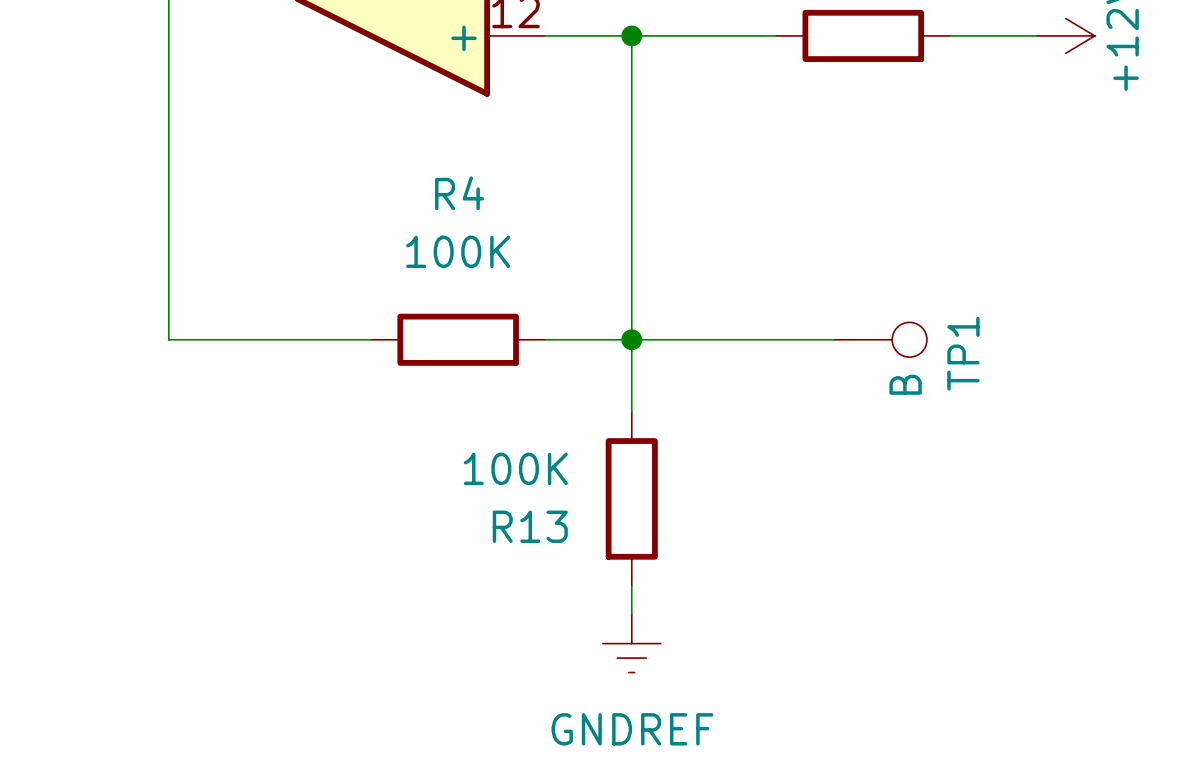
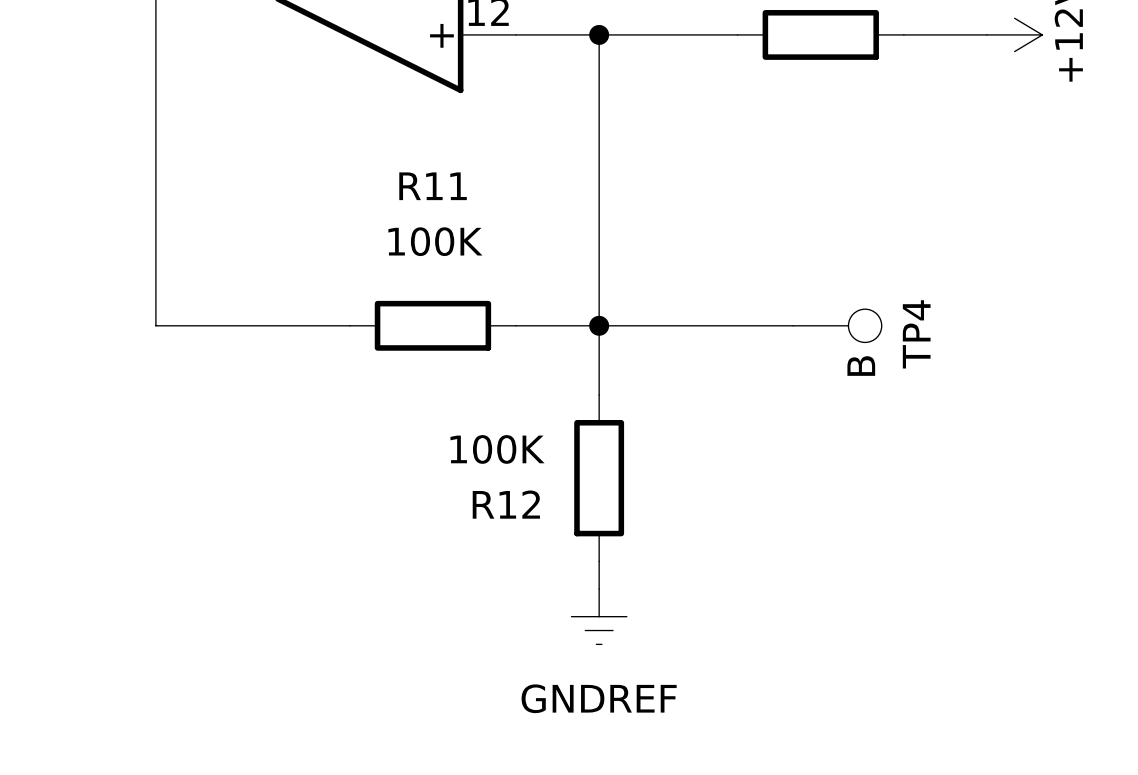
R4 name: R4 (459, 193) -> R11 (433, 186)
TP1 name: TP1 (963, 353) -> TP4 (916, 334)
R13 name: R13 (530, 526) -> R12 (506, 504)

